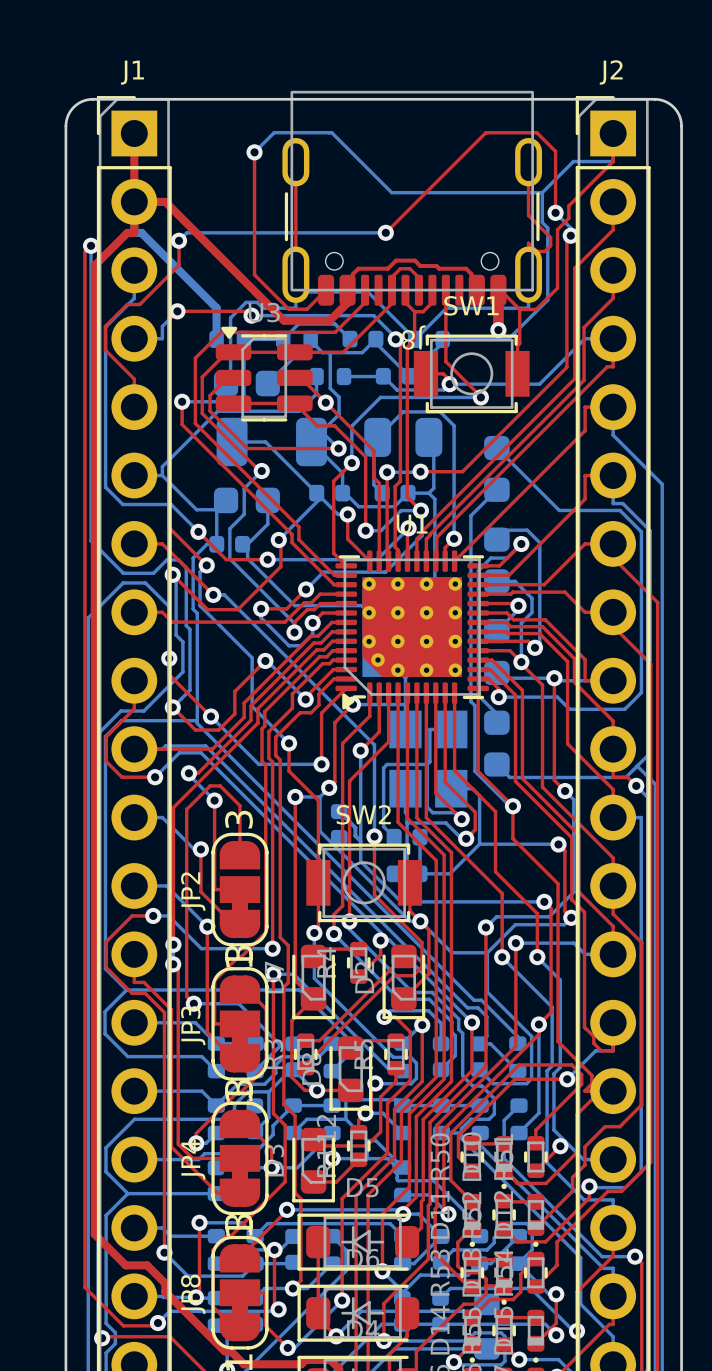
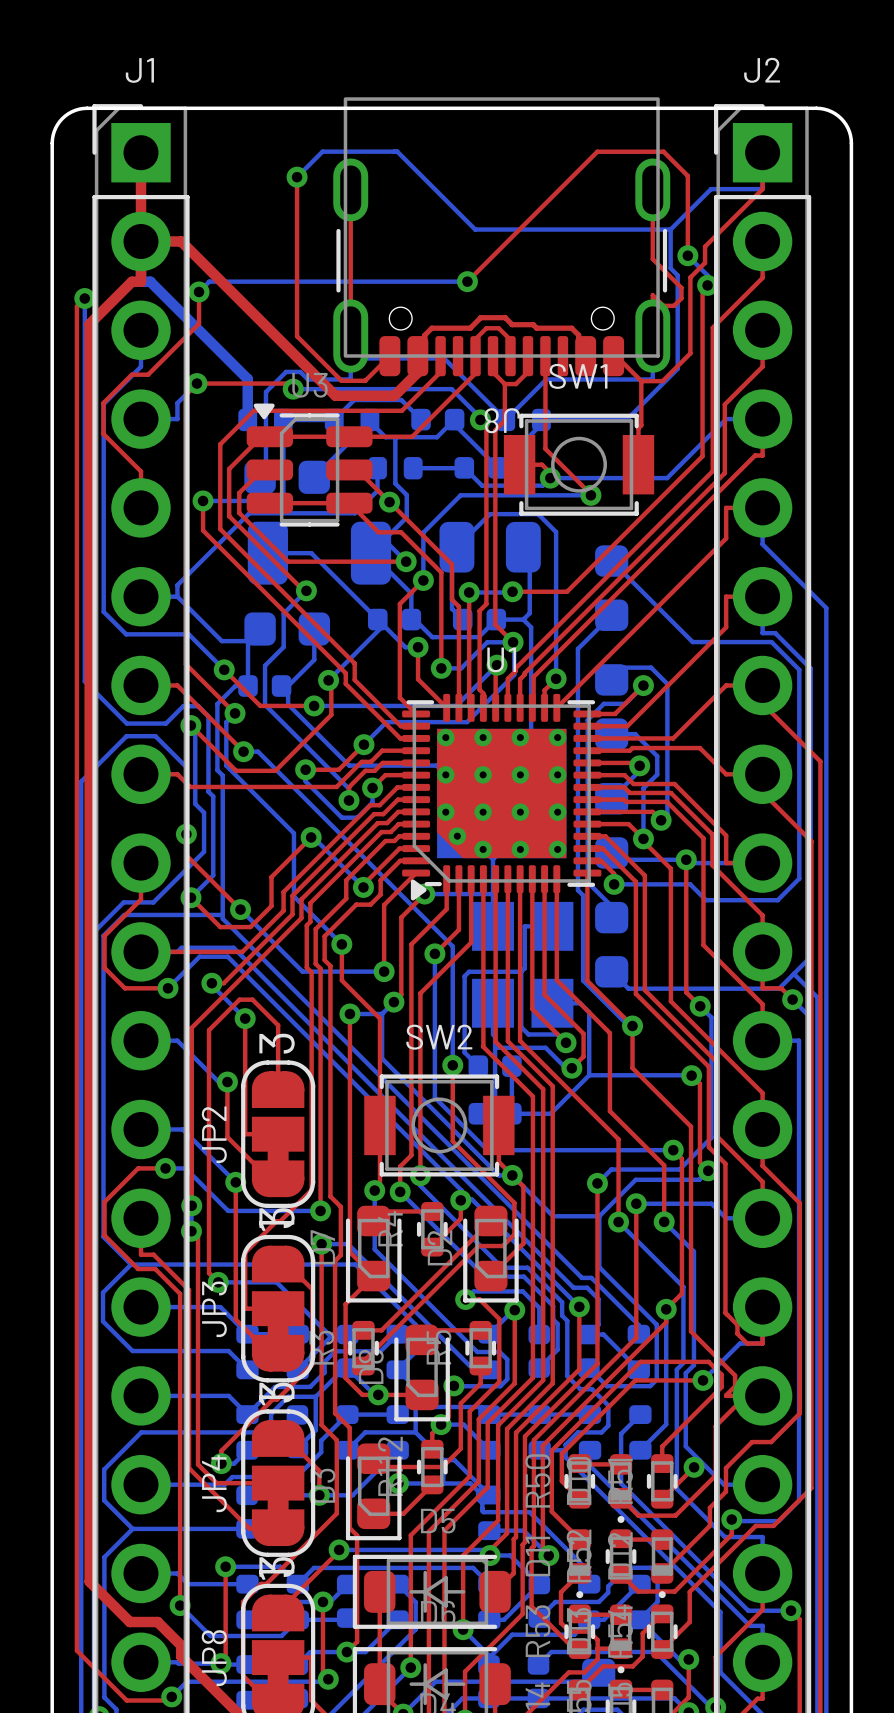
top track: (498, 298) (498, 330) -> none
via: (498, 330) -> none
bottom track: (344, 817) (355, 827) (355, 835) (360, 841) -> none
part: (339, 824) -> none

